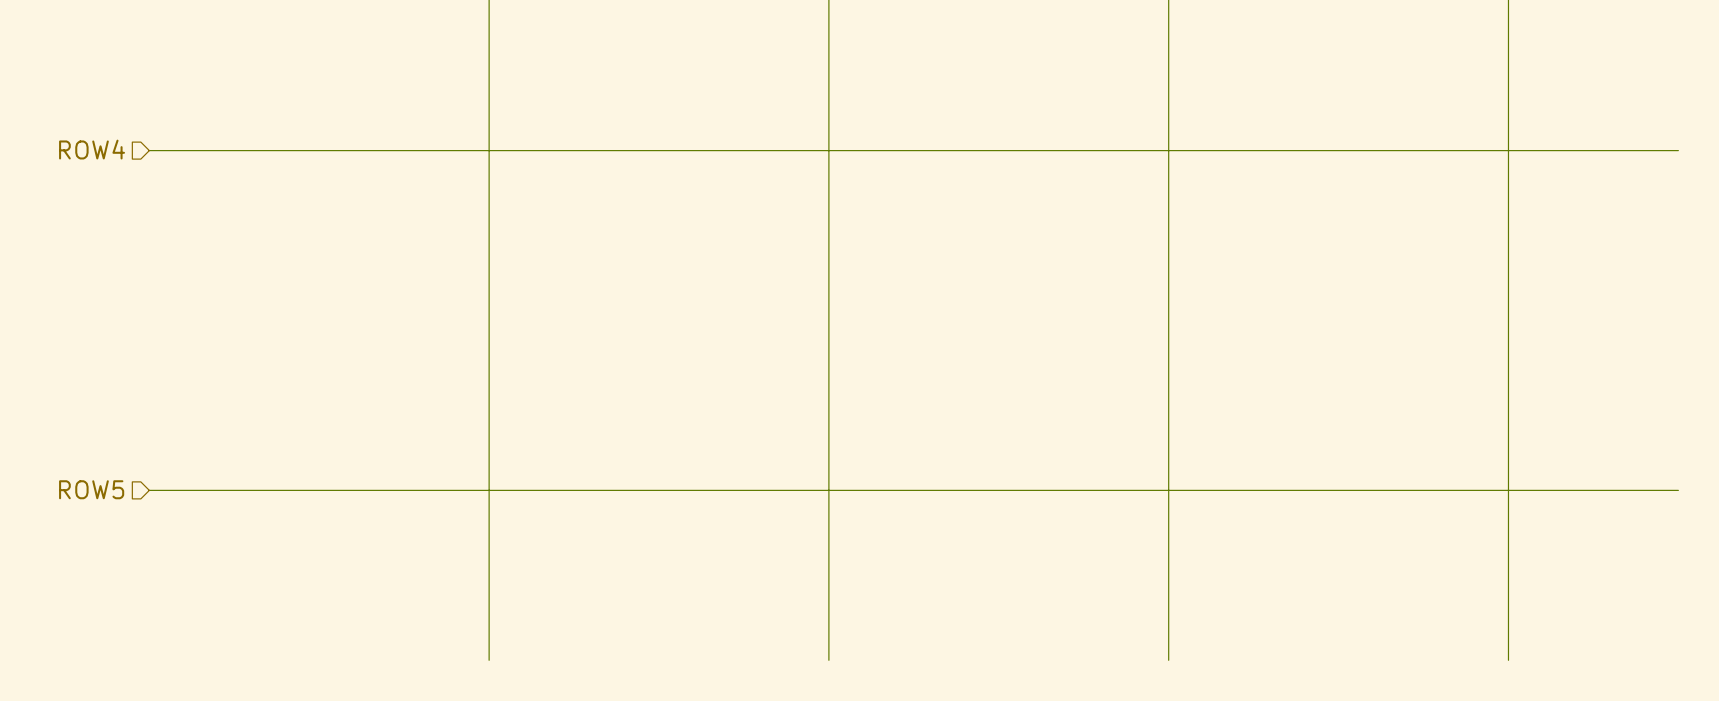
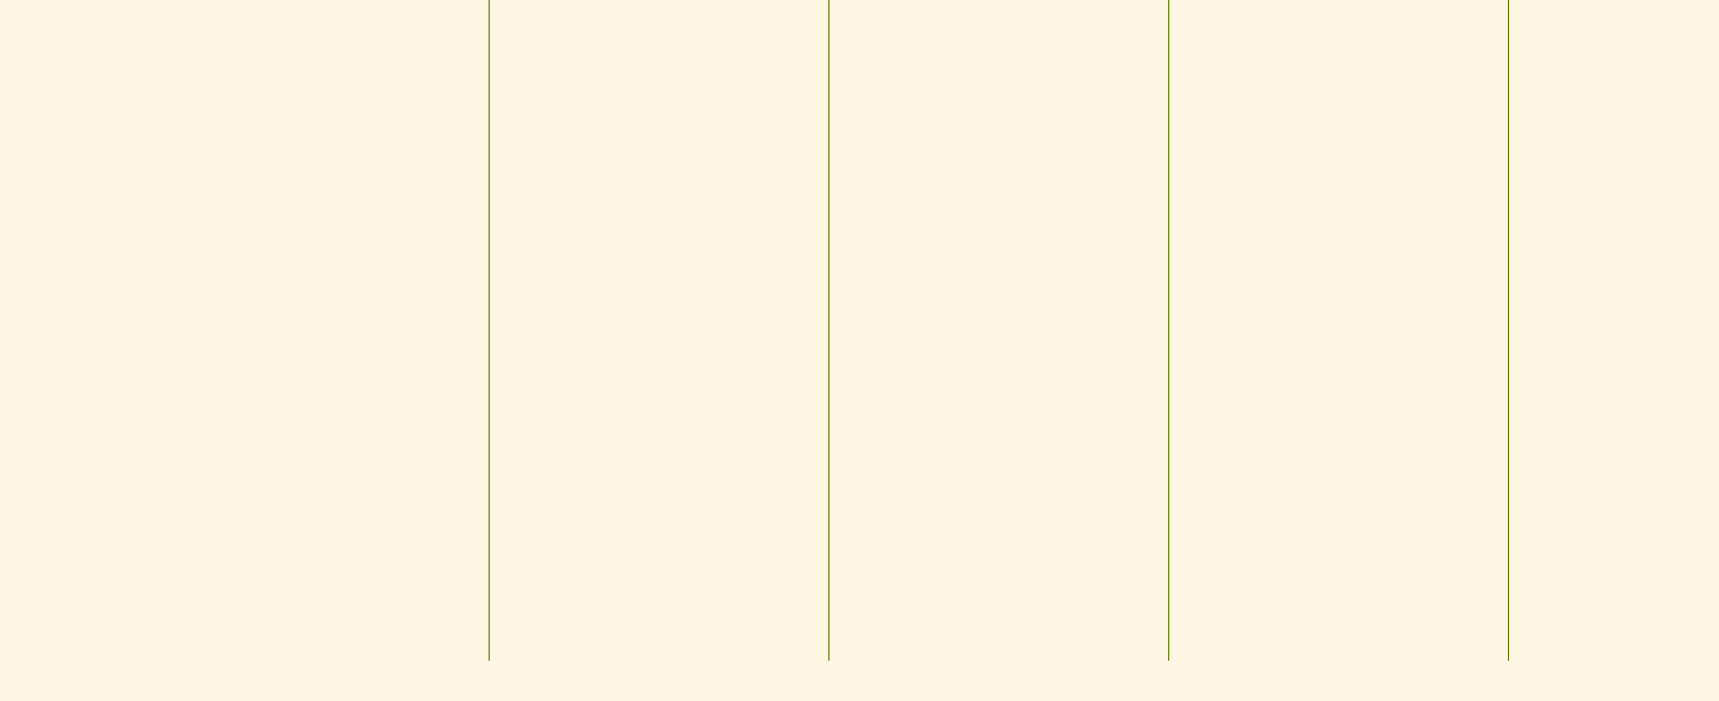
hierarchical label: ROW4 (92, 149) -> none
wire: (149, 150) (1678, 150) -> none
hierarchical label: ROW5 (91, 489) -> none
wire: (149, 490) (1678, 490) -> none

